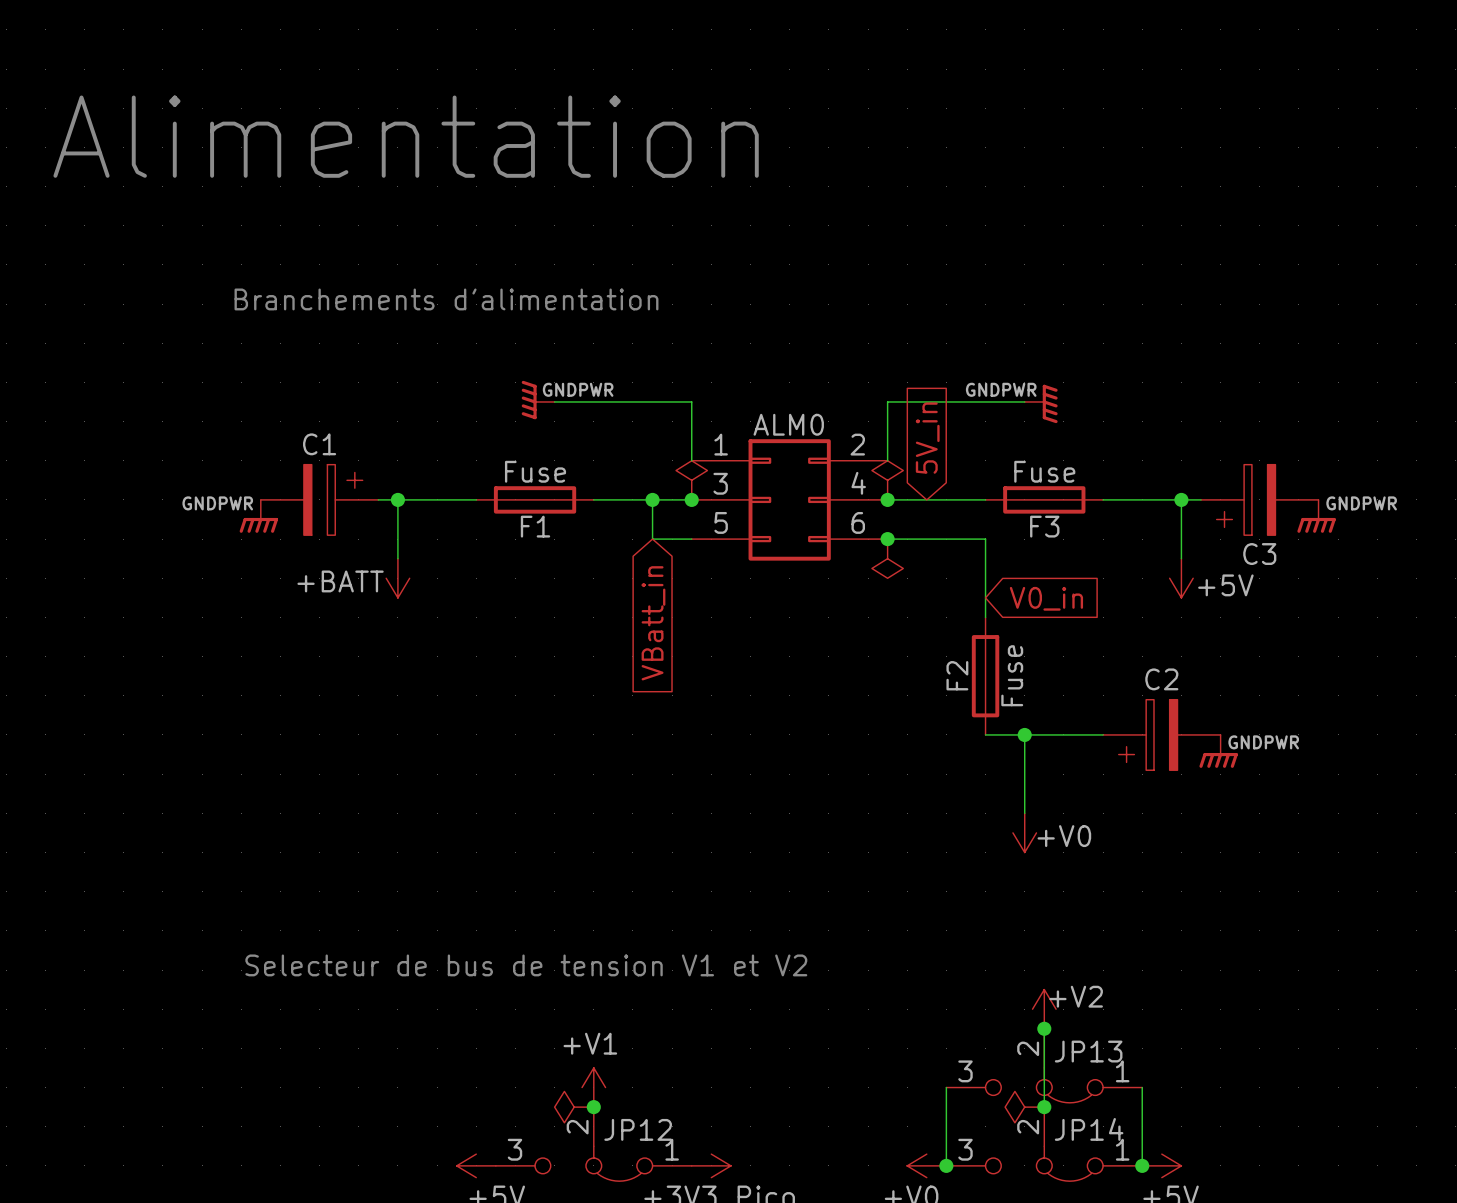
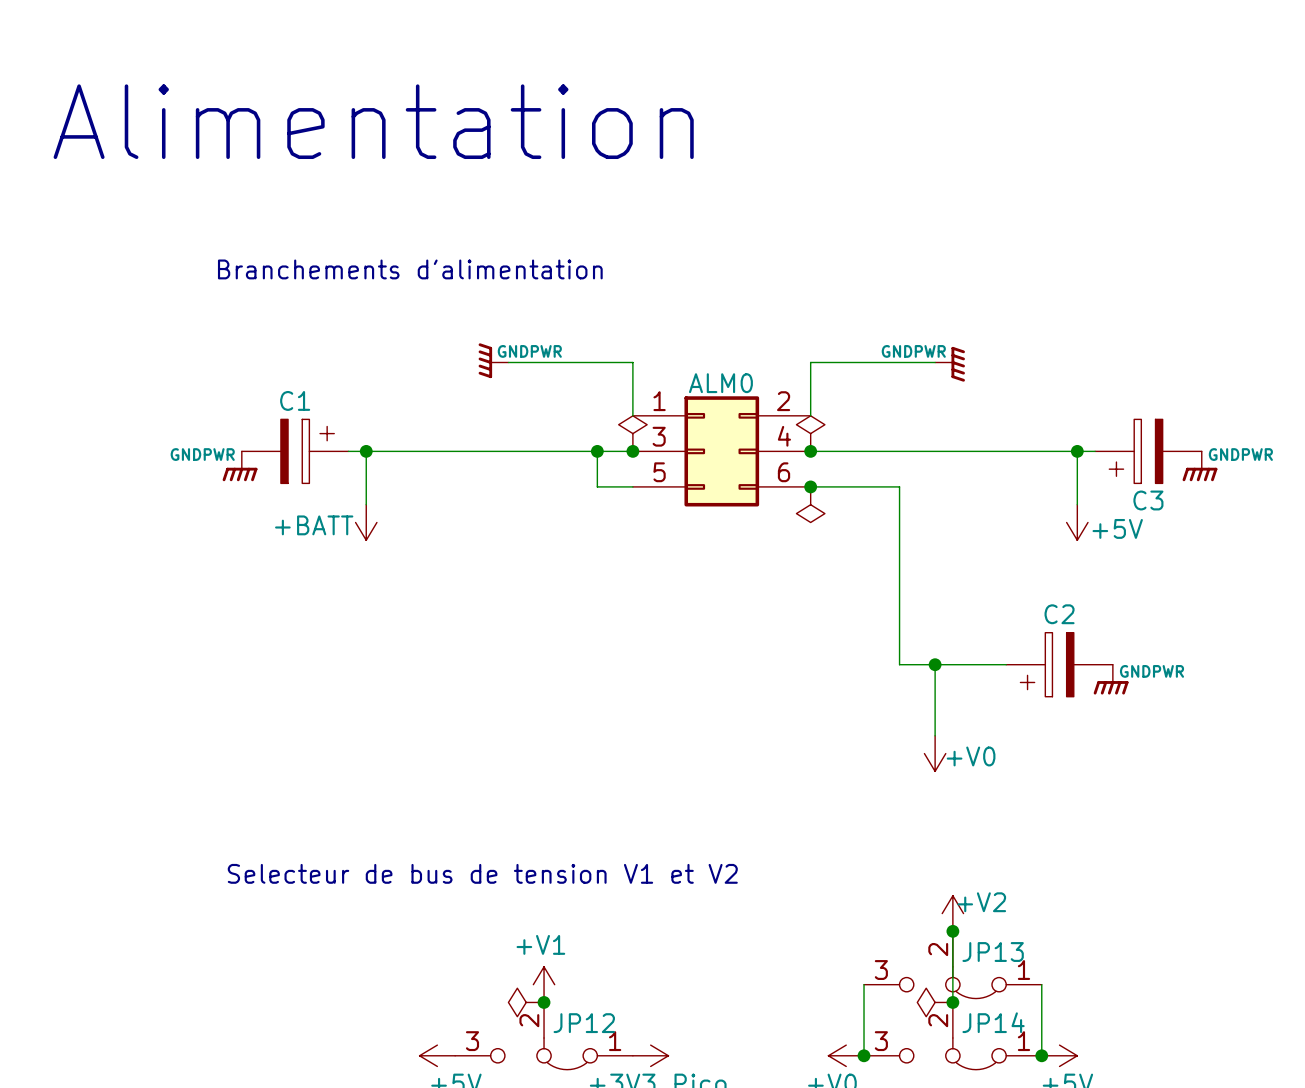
global label: 5V_in (927, 438) -> none
F1: Fuse (535, 499) -> none
F3: Fuse (1044, 499) -> none
global label: V0_in (1046, 598) -> none
global label: VBatt_in (653, 623) -> none
F2: Fuse (985, 676) -> none

